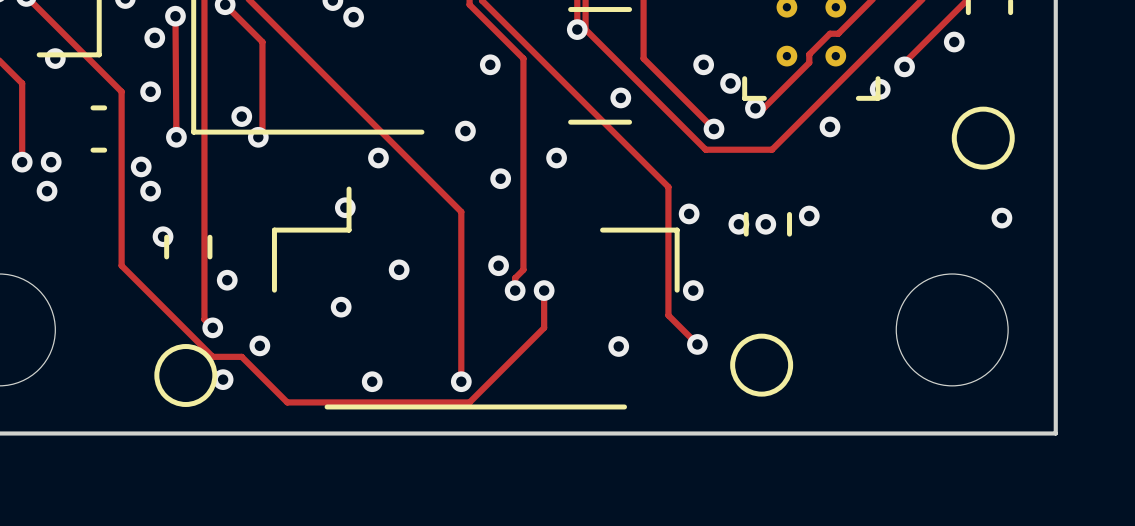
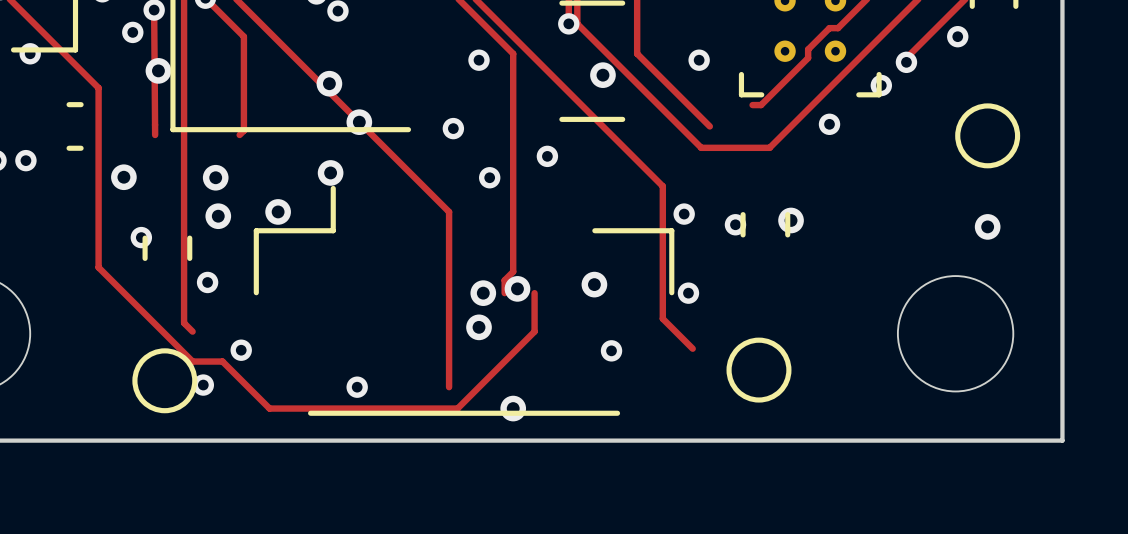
via: none -> (158, 70)
via: (730, 83) -> none
via: none -> (329, 83)
via: (150, 91) -> none
via position: (620, 97) -> (602, 75)
via: (755, 108) -> none
via: (241, 116) -> none
via: none -> (359, 122)
via: (714, 129) -> none
via: (176, 137) -> none
via: (258, 137) -> none
via: (378, 158) -> none
via: (141, 166) -> none
via: none -> (330, 172)
via: none -> (123, 177)
via: none -> (215, 177)
via: (47, 191) -> none
via: (150, 191) -> none
via: (345, 207) -> none
via: none -> (278, 211)
via: none -> (218, 216)
via position: (809, 216) -> (791, 220)
via position: (1001, 218) -> (987, 226)
via: (765, 224) -> none
via: (498, 265) -> none
via: (399, 269) -> none
via: none -> (594, 284)
via: none -> (517, 288)
via: none -> (483, 293)
via: (515, 290) -> none
via: (544, 290) -> none
via: (341, 307) -> none
via: none -> (479, 327)
via: (212, 327) -> none
via: (697, 344) -> none
via: (461, 381) -> none
via: none -> (513, 408)

